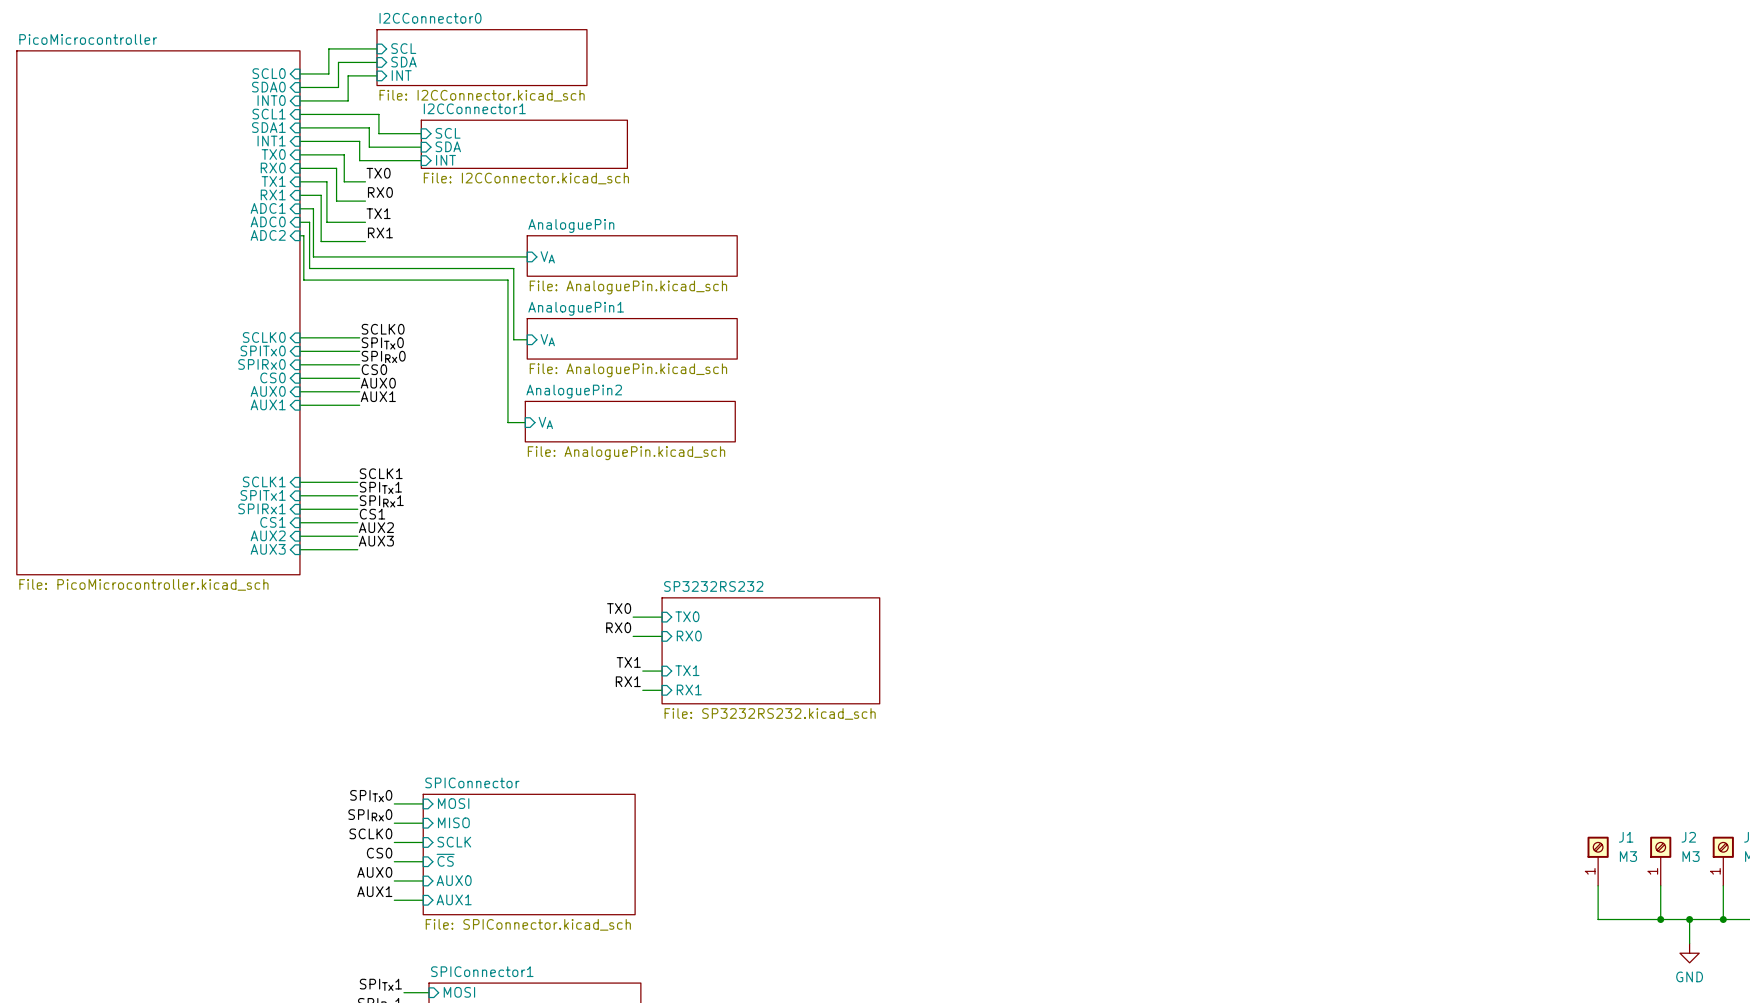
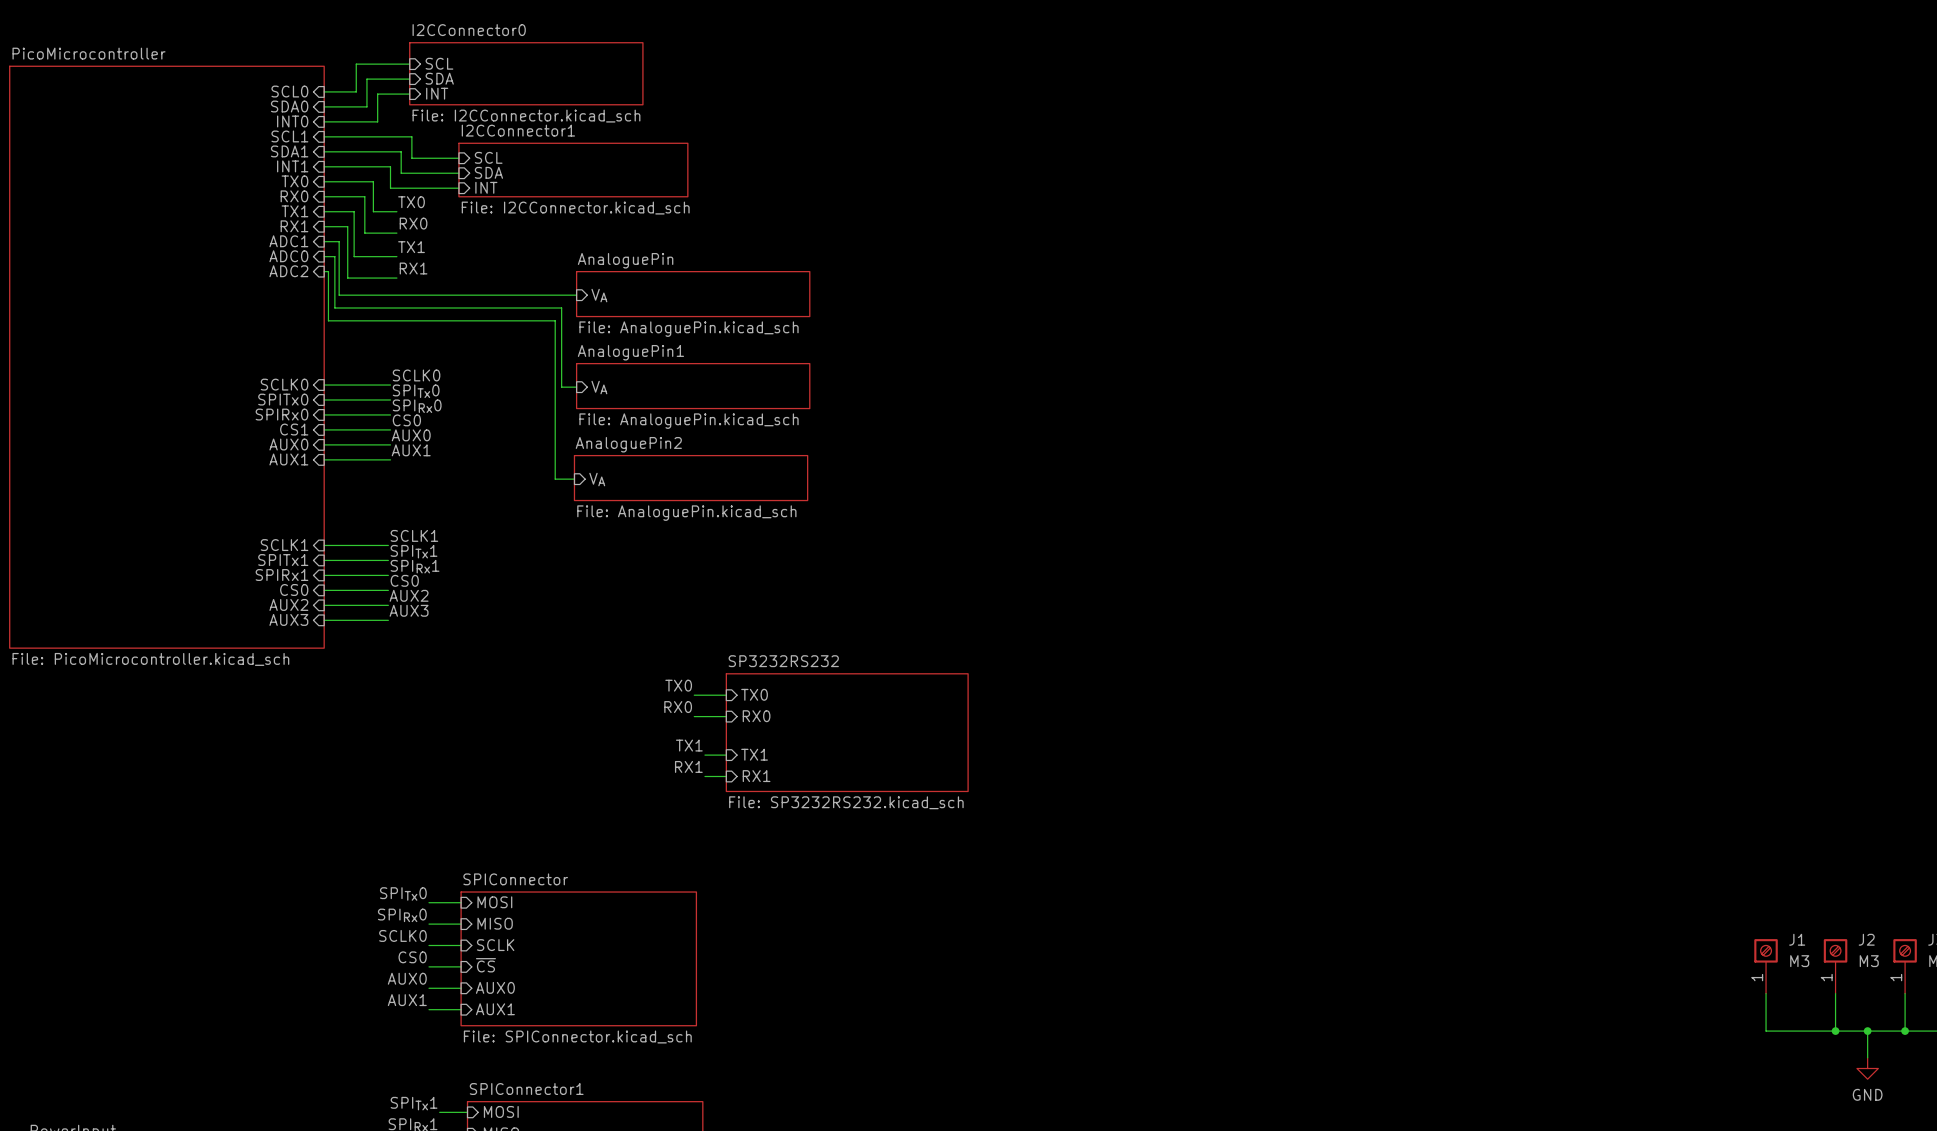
sheet pin: CS0 (272, 377) -> CS1 (294, 429)
label: CS1 (372, 514) -> CS0 (404, 580)
sheet pin: CS1 (272, 522) -> CS0 (294, 589)

